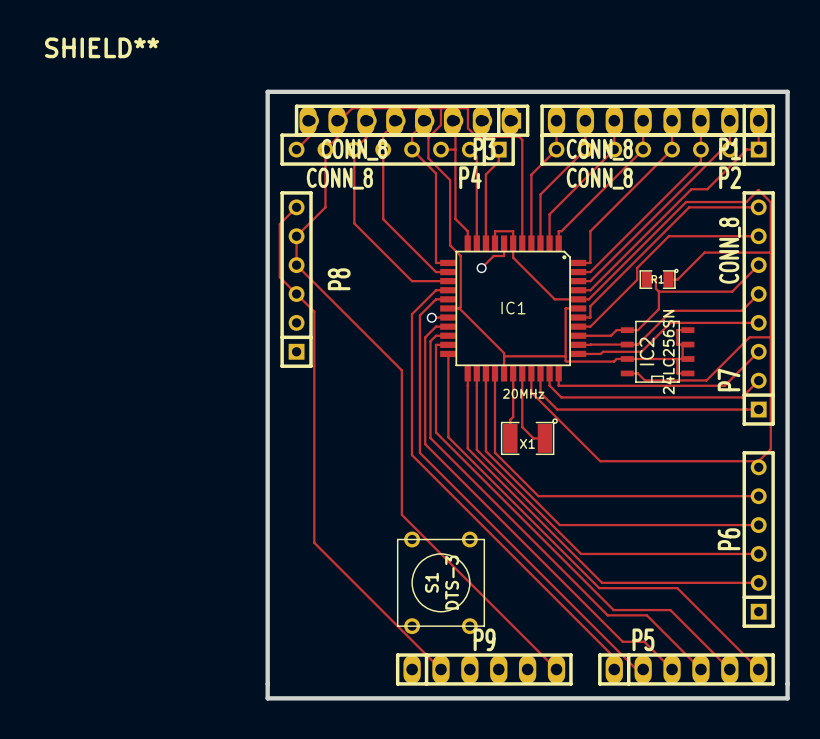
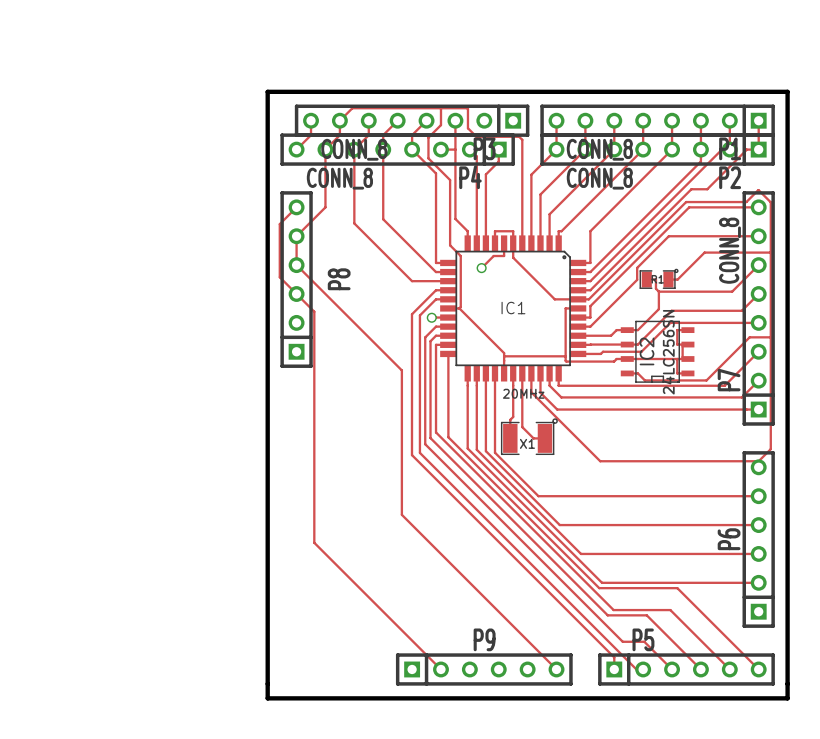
SHIELD**: (533, 395) -> none
S1: DTS-3 (440, 582) -> none

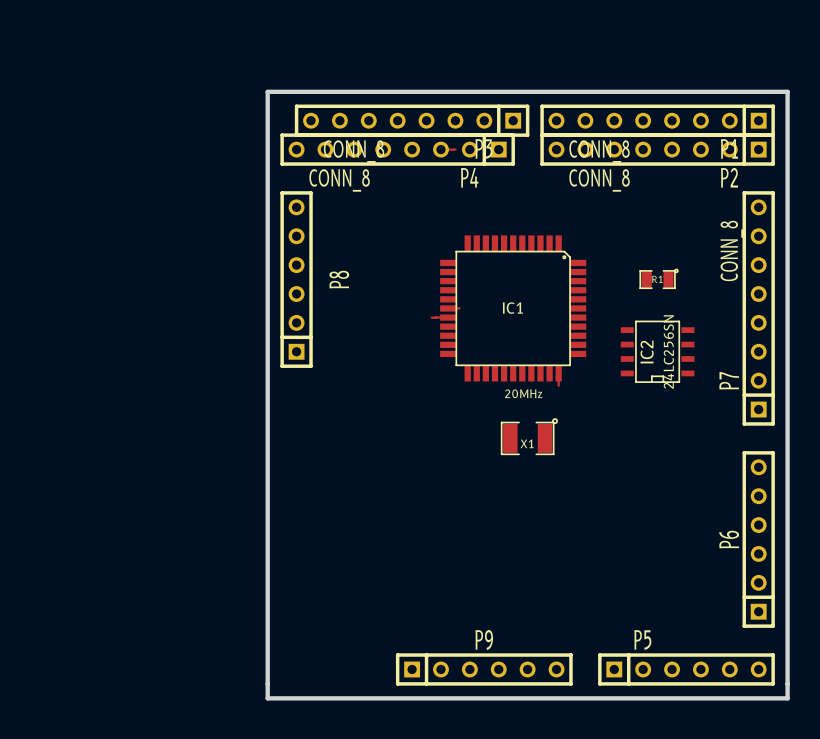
track: (440, 108) (440, 125) (428, 137) (428, 158) (450, 180) (450, 245) (460, 256) (459, 308) (504, 353) (504, 373) -> none
track: (311, 120) (311, 135) (296, 149) -> none
track: (368, 120) (368, 135) (354, 149) (354, 223) (412, 281) (448, 281) -> none
track: (397, 120) (383, 135) (383, 219) (435, 272) (448, 272) -> none
track: (426, 120) (412, 135) (412, 149) (436, 173) (436, 262) (448, 262) -> none
track: (455, 120) (455, 218) (467, 231) (467, 243) -> none
track: (556, 120) (556, 149) (531, 174) (531, 243) -> none
track: (585, 120) (585, 149) (540, 194) (540, 243) -> none
track: (614, 120) (614, 149) (549, 214) (549, 243) -> none
track: (643, 120) (643, 149) (561, 231) (558, 231) (558, 243) -> none
track: (672, 120) (672, 149) (590, 231) (590, 262) (578, 262) -> none
track: (700, 120) (700, 161) (590, 272) (578, 272) -> none
track: (729, 120) (729, 149) (721, 149) (590, 281) (578, 281) -> none
track: (758, 120) (758, 149) (746, 149) (707, 189) (691, 189) (590, 290) (578, 290) -> none
track: (469, 149) (476, 156) (476, 243) -> none
track: (498, 149) (498, 161) (485, 174) (485, 243) -> none
track: (296, 207) (279, 224) (279, 277) (314, 311) (314, 542) (440, 669) -> none
track: (758, 207) (689, 207) (590, 306) (590, 317) (578, 317) -> none
track: (758, 236) (668, 236) (637, 267) (637, 279) (590, 326) (578, 326) -> none
track: (495, 243) (495, 231) (513, 231) (513, 257) (554, 299) (588, 299) (686, 202) (746, 202) (758, 190) (770, 202) (770, 252) -> none
track: (504, 243) (504, 256) (493, 256) (481, 268) -> none
track: (522, 243) (522, 139) (519, 136) (476, 136) (467, 128) (467, 108) (352, 108) (339, 120) (339, 135) (325, 149) (325, 207) (296, 236) (296, 265) (401, 370) (401, 514) (556, 669) -> none
track: (770, 252) (770, 337) -> none
track: (770, 252) (704, 252) (677, 279) (668, 279) -> none
track: (758, 265) (732, 291) (658, 291) -> none
via: (481, 268) -> none
track: (646, 279) (655, 279) (655, 288) (658, 291) -> none
track: (448, 290) (436, 290) (411, 314) (411, 455) (614, 657) (614, 669) -> none
track: (658, 291) (658, 309) (637, 330) (616, 330) (611, 335) (578, 335) -> none
track: (758, 294) (741, 310) (671, 310) (637, 344) (578, 344) -> none
track: (448, 299) (436, 299) (419, 315) (419, 452) (636, 669) (643, 669) -> none
track: (578, 308) (565, 308) (566, 361) (614, 361) (616, 358) (687, 358) -> none
via: (431, 317) -> none
track: (758, 322) (670, 322) (641, 351) (578, 353) -> none
track: (448, 326) (436, 326) (425, 337) (425, 444) (622, 641) (644, 641) (672, 669) -> none
track: (687, 330) (677, 330) (677, 344) (687, 344) -> none
track: (448, 335) (436, 335) (430, 341) (430, 438) (607, 615) (646, 615) (700, 669) -> none
track: (770, 337) (749, 337) (706, 380) (644, 380) (637, 373) (627, 373) -> none
track: (770, 337) (770, 449) (758, 461) -> none
track: (448, 344) (436, 344) (436, 432) (613, 610) (670, 610) (729, 669) -> none
track: (682, 344) (682, 358) -> none
track: (758, 351) (724, 385) (558, 385) -> none
track: (448, 353) (448, 437) (599, 588) (677, 588) (758, 669) -> none
track: (504, 356) (565, 356) -> none
track: (677, 358) (677, 373) (687, 373) -> none
track: (467, 373) (467, 448) (602, 582) (758, 582) -> none
track: (476, 373) (476, 449) (581, 553) (758, 553) -> none
track: (485, 373) (485, 451) (559, 525) (758, 525) -> none
track: (495, 373) (495, 452) (538, 496) (758, 496) -> none
track: (513, 373) (513, 416) (510, 419) (510, 438) -> none
track: (522, 373) (522, 427) (533, 438) (544, 438) -> none
track: (531, 373) (531, 392) (600, 461) (758, 461) -> none
track: (540, 373) (540, 392) (557, 409) (758, 409) -> none
track: (549, 373) (549, 385) (561, 397) (741, 397) (758, 380) -> none

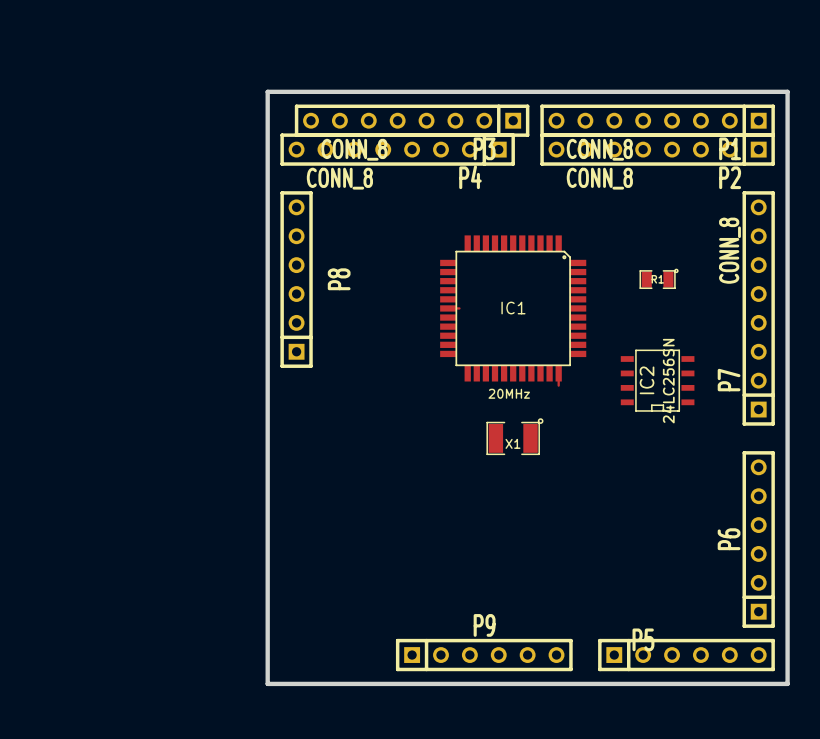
track: (440, 149) (455, 149) -> none
track: (448, 317) (431, 317) -> none
IC2 position: (657, 351) -> (657, 380)
X1 position: (529, 436) -> (514, 436)
P9 position: (484, 669) -> (484, 655)
P5 position: (686, 669) -> (686, 655)
board edge: (267, 683) (267, 698) (787, 698) (787, 683) -> (267, 683) (787, 683)

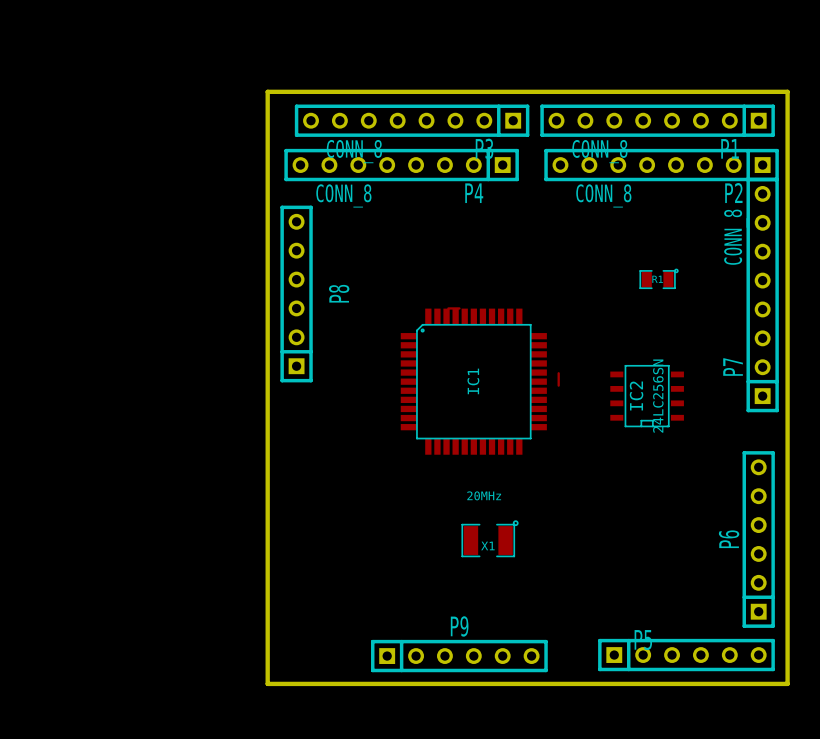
P4 position: (397, 149) -> (401, 165)
P2 position: (657, 149) -> (661, 165)
P8 position: (296, 279) -> (296, 294)
IC1 rotation: 0° (513, 308) -> 90° counterclockwise (473, 381)
P7 position: (758, 308) -> (762, 295)
IC2 position: (657, 380) -> (647, 396)
X1 position: (514, 436) -> (490, 538)
P9 position: (484, 655) -> (459, 656)

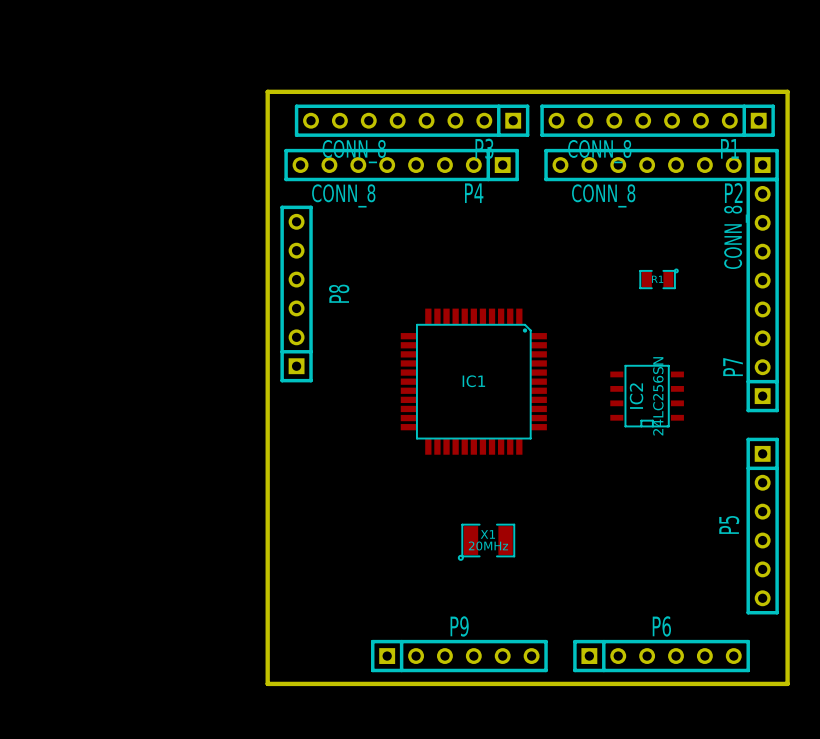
track: (448, 308) (459, 308) -> none
track: (558, 373) (558, 385) -> none
IC1 rotation: 0° (473, 381) -> 90° clockwise (473, 381)
X1 value position: 20MHz (484, 495) -> 20MHz (488, 545)
X1 rotation: 0° (490, 538) -> 180° (486, 542)
P6 rotation: 0° (758, 539) -> 90° clockwise (661, 656)
P6 position: (758, 539) -> (661, 656)
P5 rotation: 0° (686, 655) -> 90° clockwise (762, 526)
P5 position: (686, 655) -> (762, 526)

